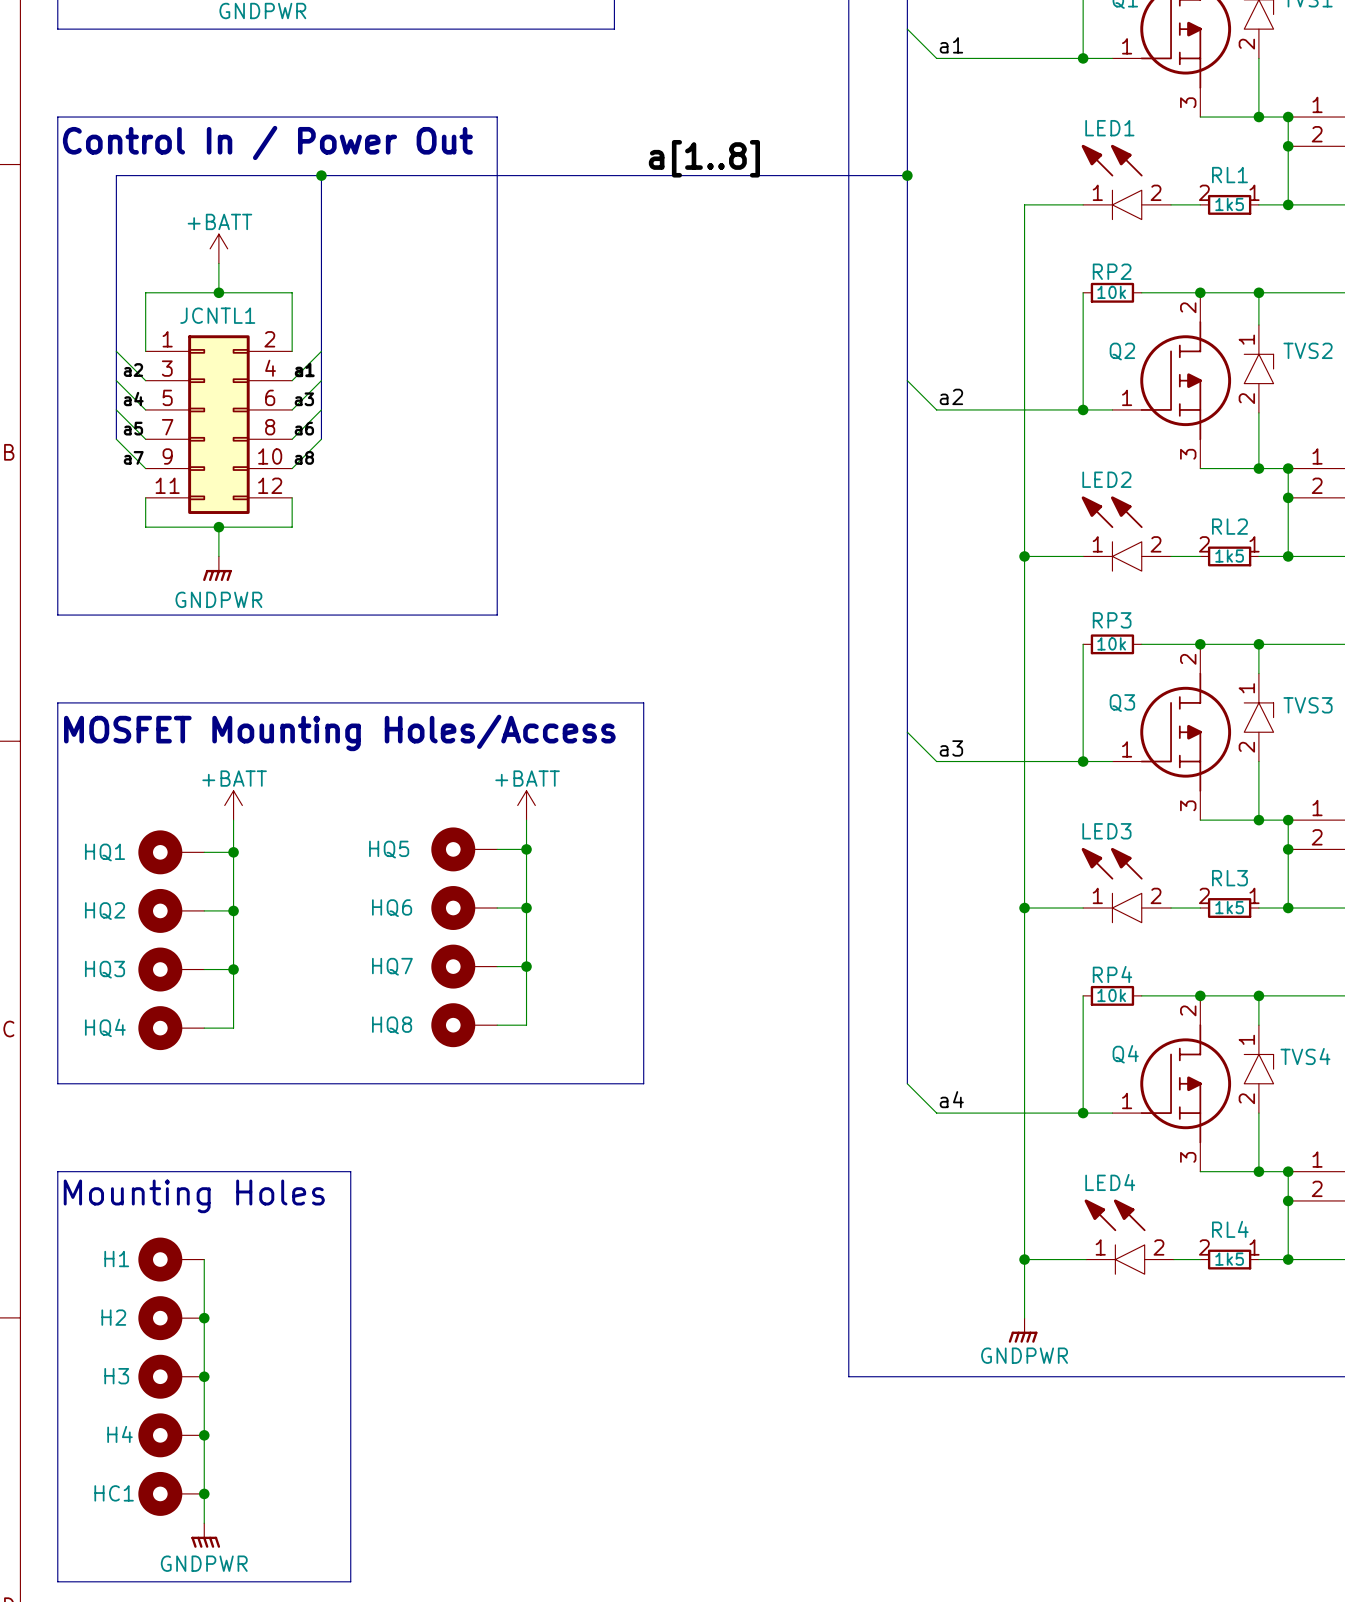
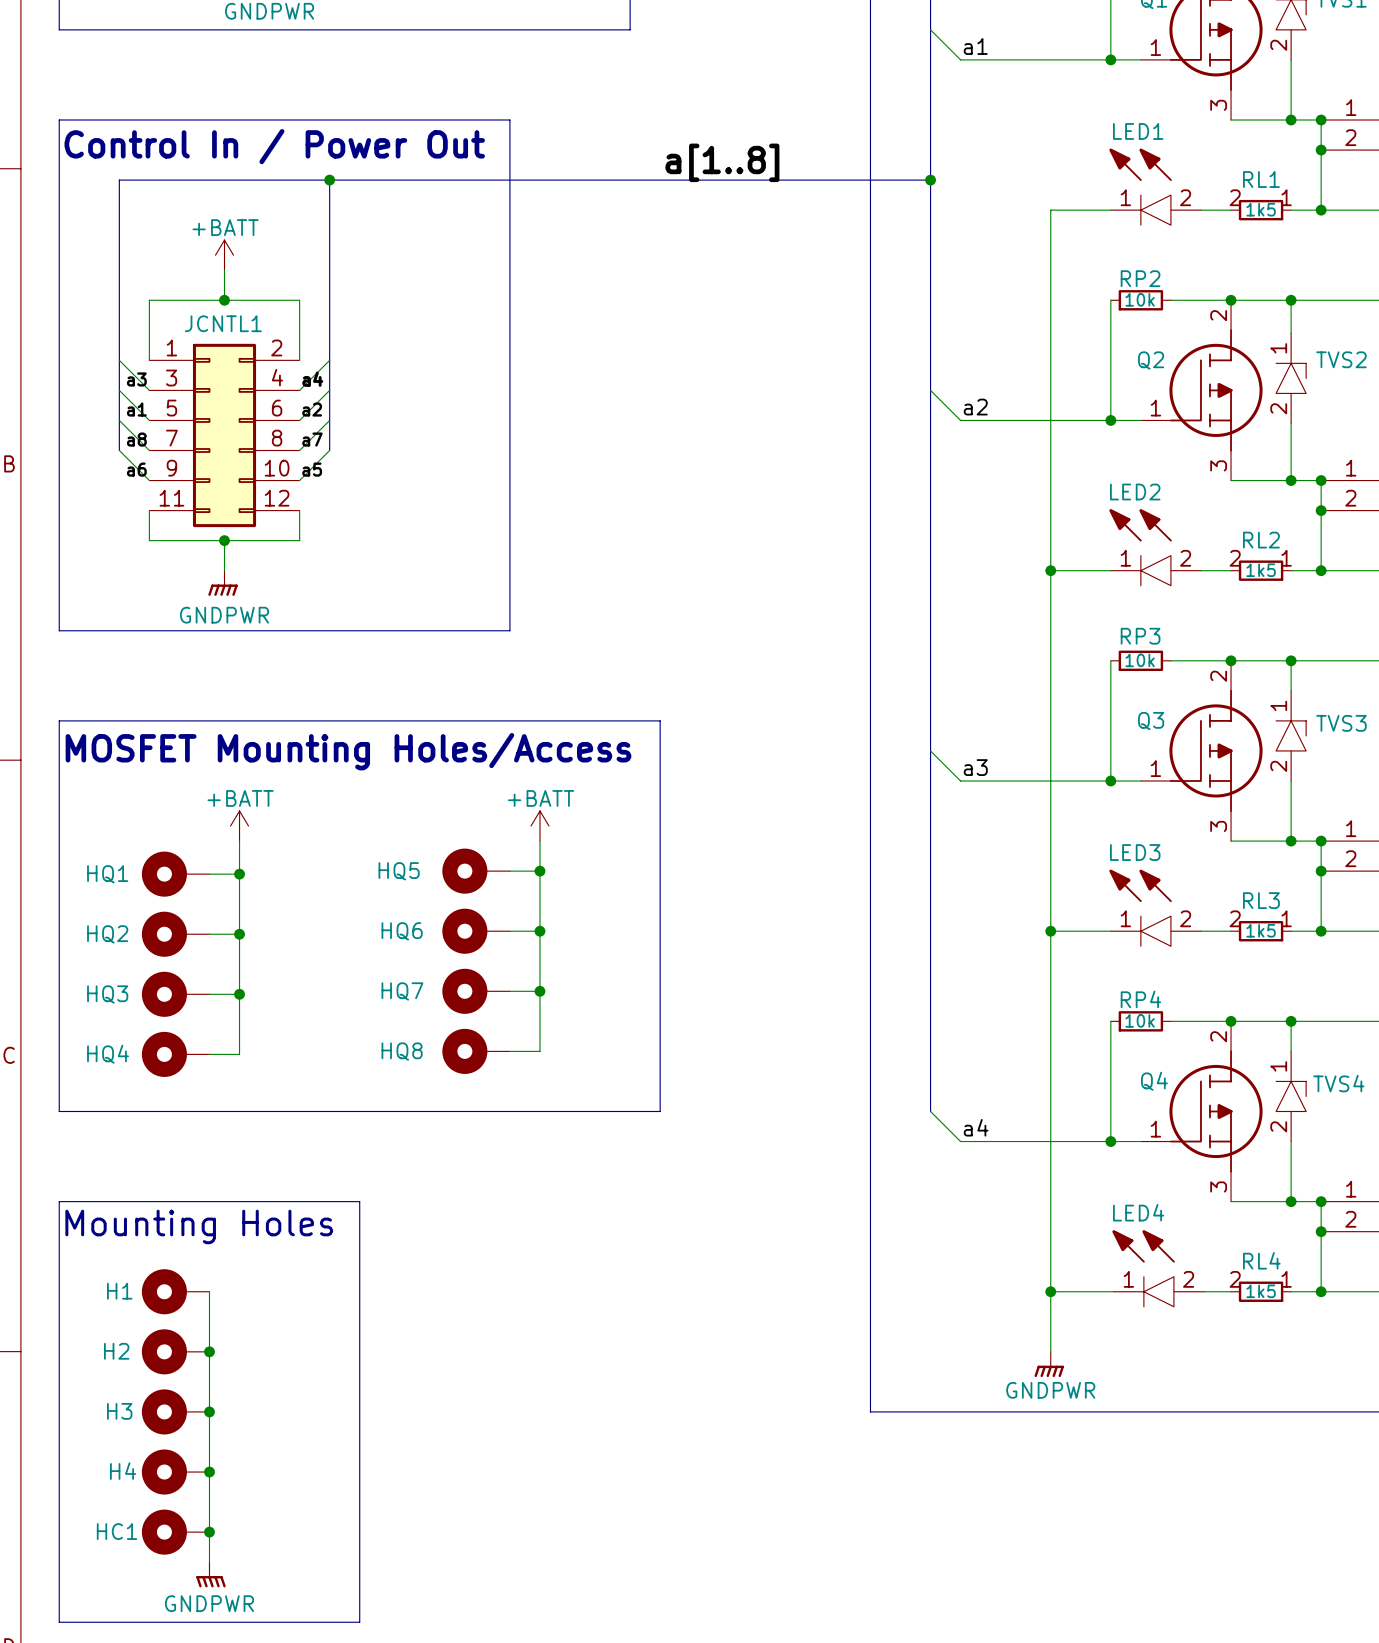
label: a2 (133, 370) -> a3 (136, 379)
label: a1 (304, 370) -> a4 (312, 379)
label: a4 (133, 399) -> a1 (136, 409)
label: a3 (304, 399) -> a2 (312, 409)
label: a5 (133, 428) -> a8 (136, 439)
label: a6 (304, 428) -> a7 (312, 439)
label: a7 (133, 457) -> a6 (136, 469)
label: a8 (304, 457) -> a5 (312, 469)

